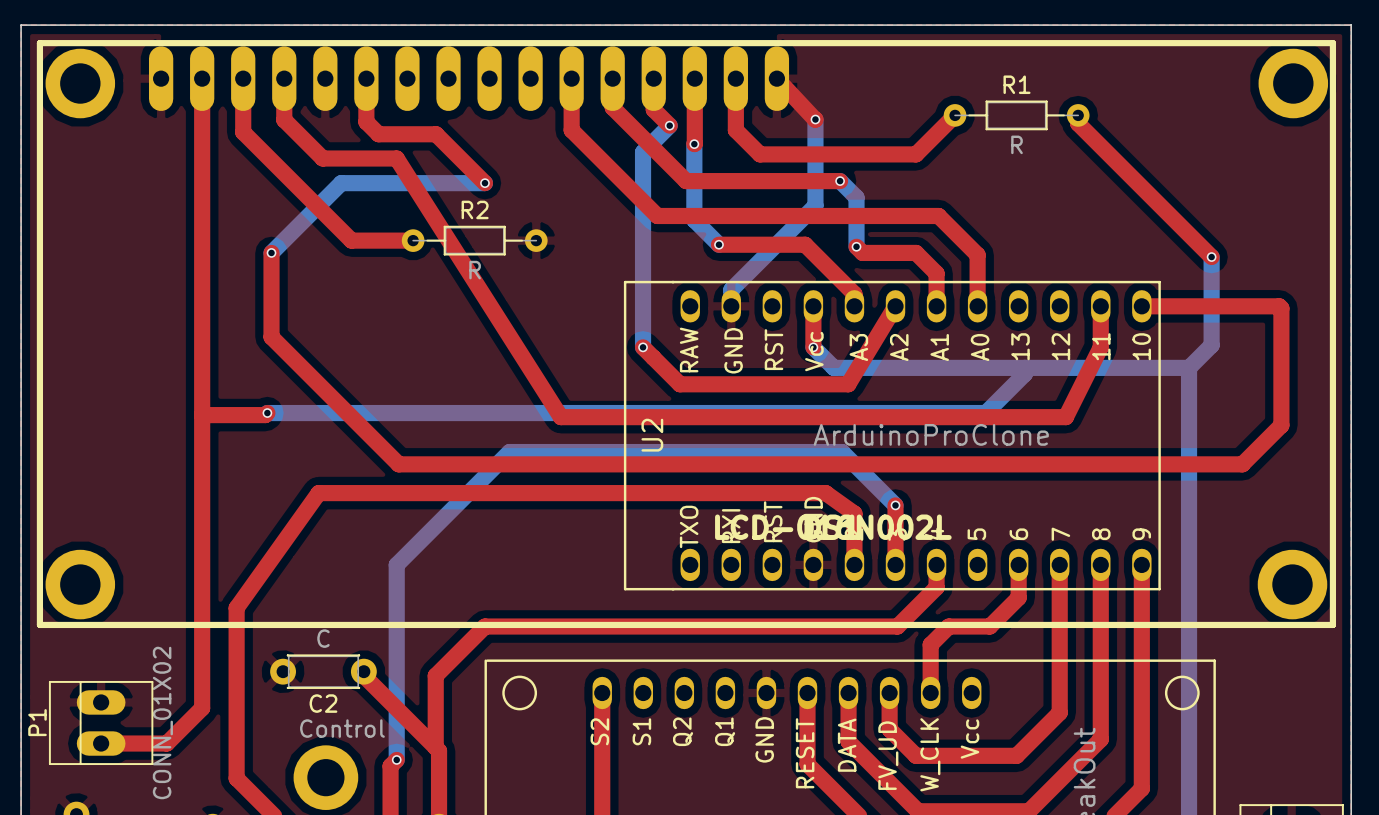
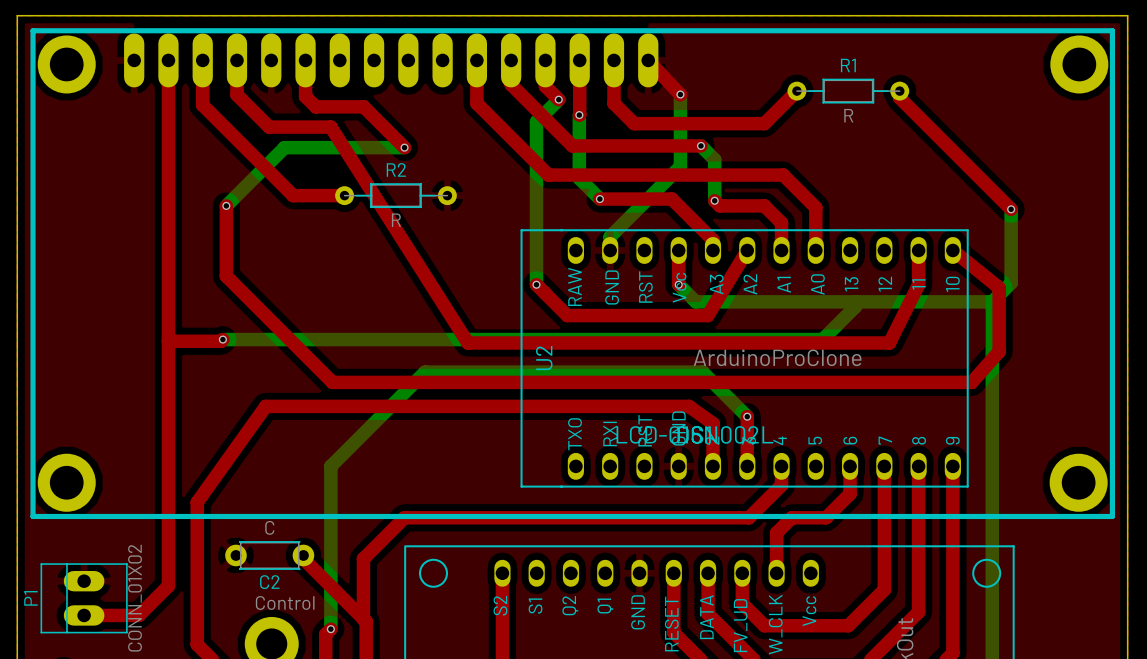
top track: (1141, 306) (1279, 306) (1281, 308) (1281, 425) (1242, 464) (1164, 464) -> (952, 250) (999, 288) (999, 351) (971, 382)

